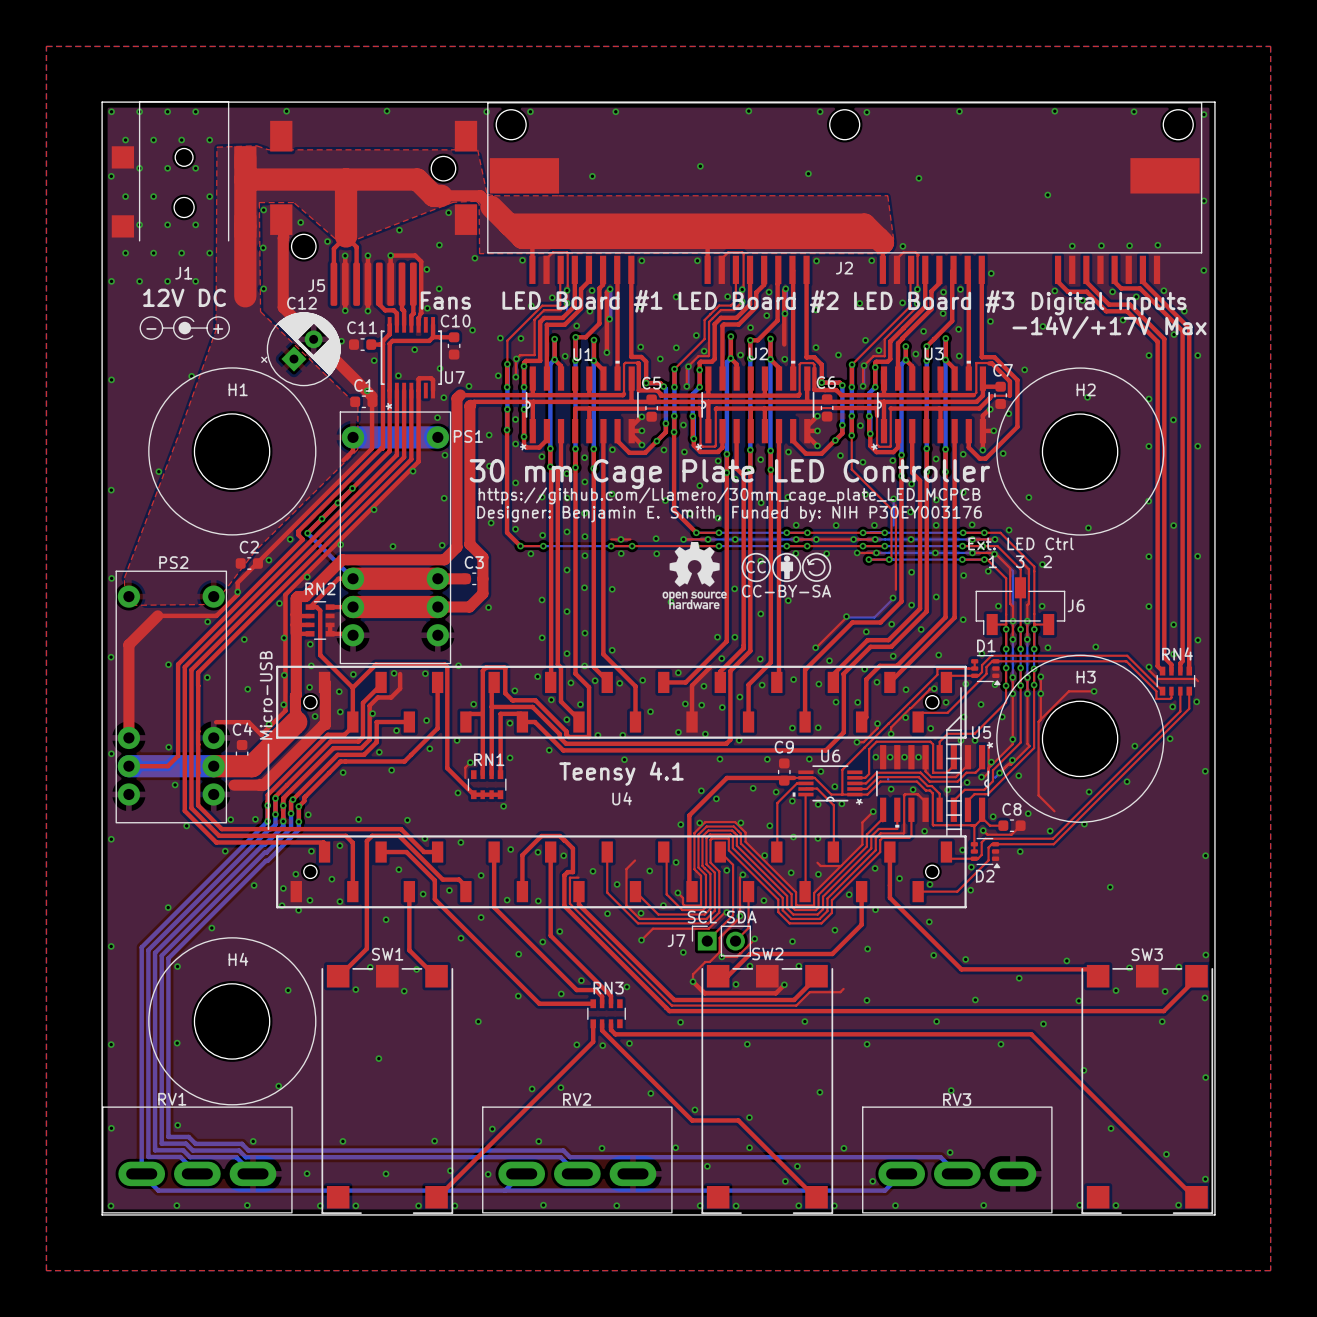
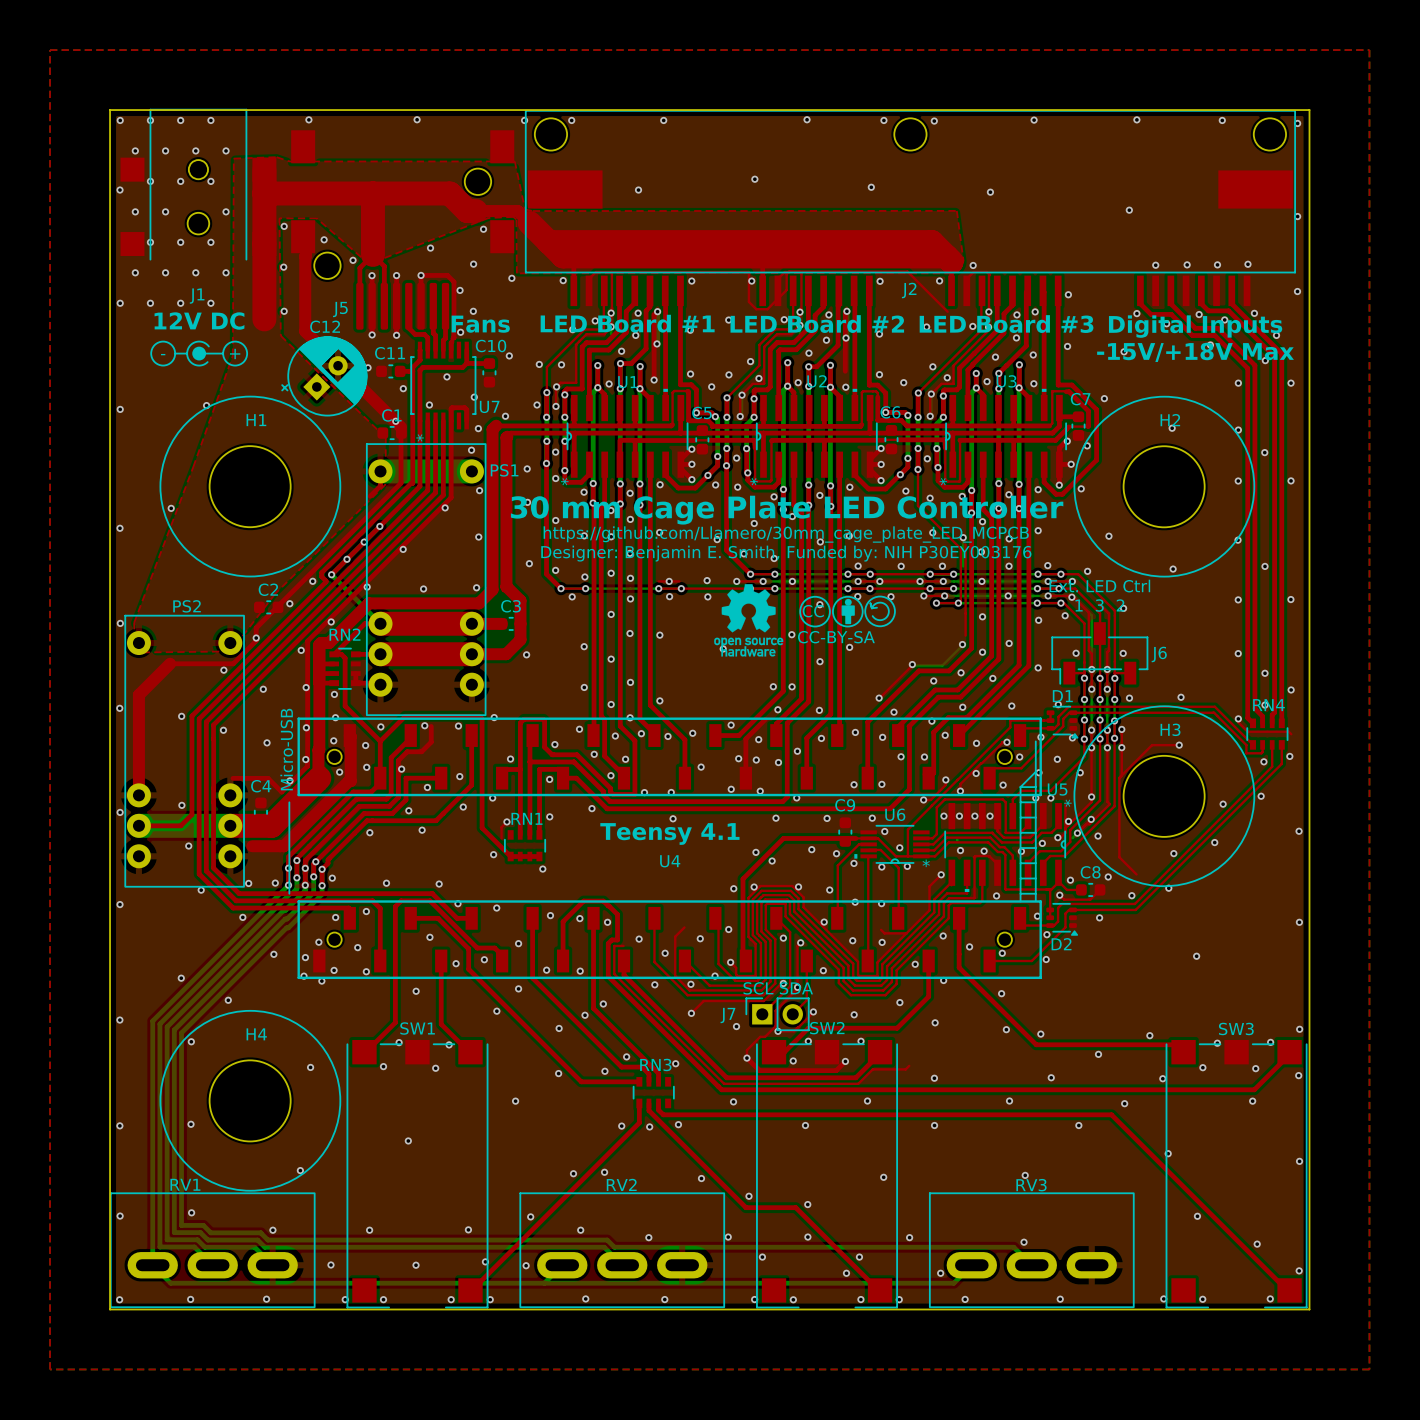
top track: none -> (611, 272) (748, 272) (748, 301) (756, 309) (767, 309) (786, 290) (786, 274) (789, 271) (907, 271) (947, 311)
text: -14V/+17V Max (1109, 327) -> -15V/+18V Max (1195, 352)

